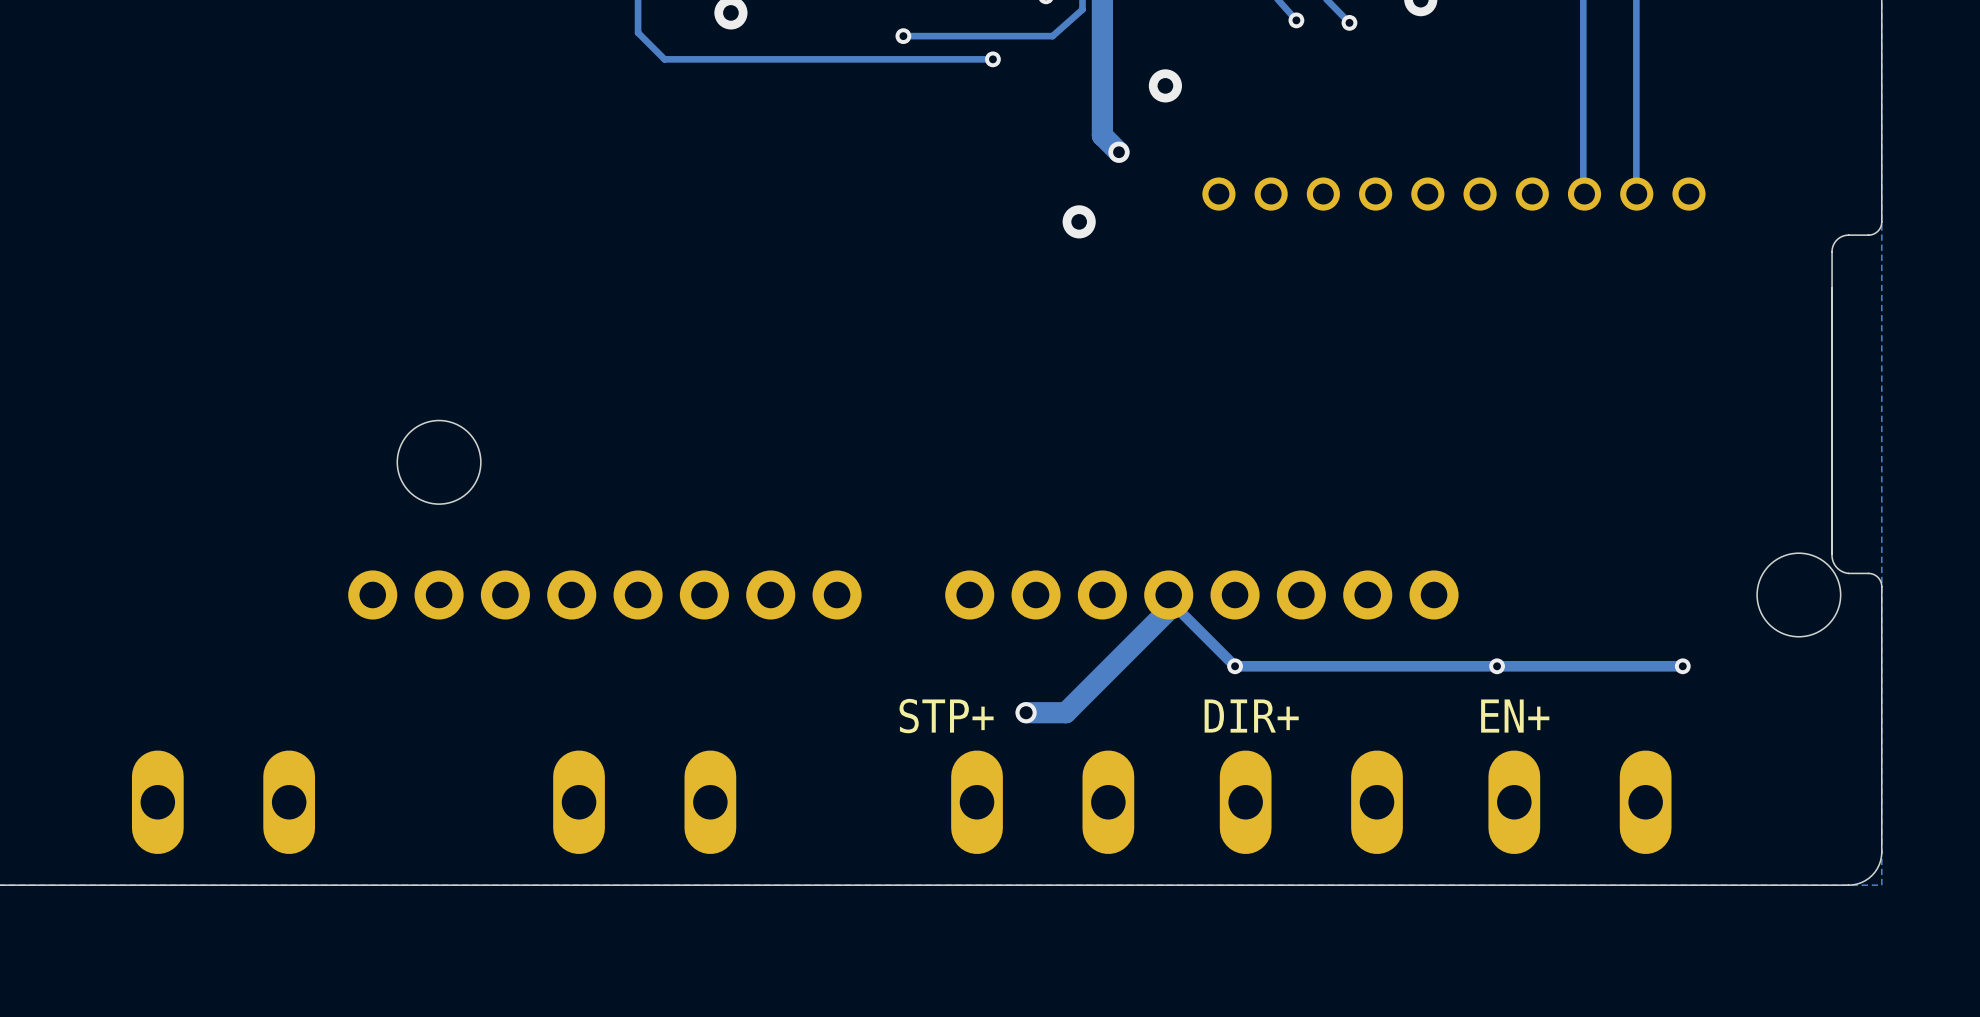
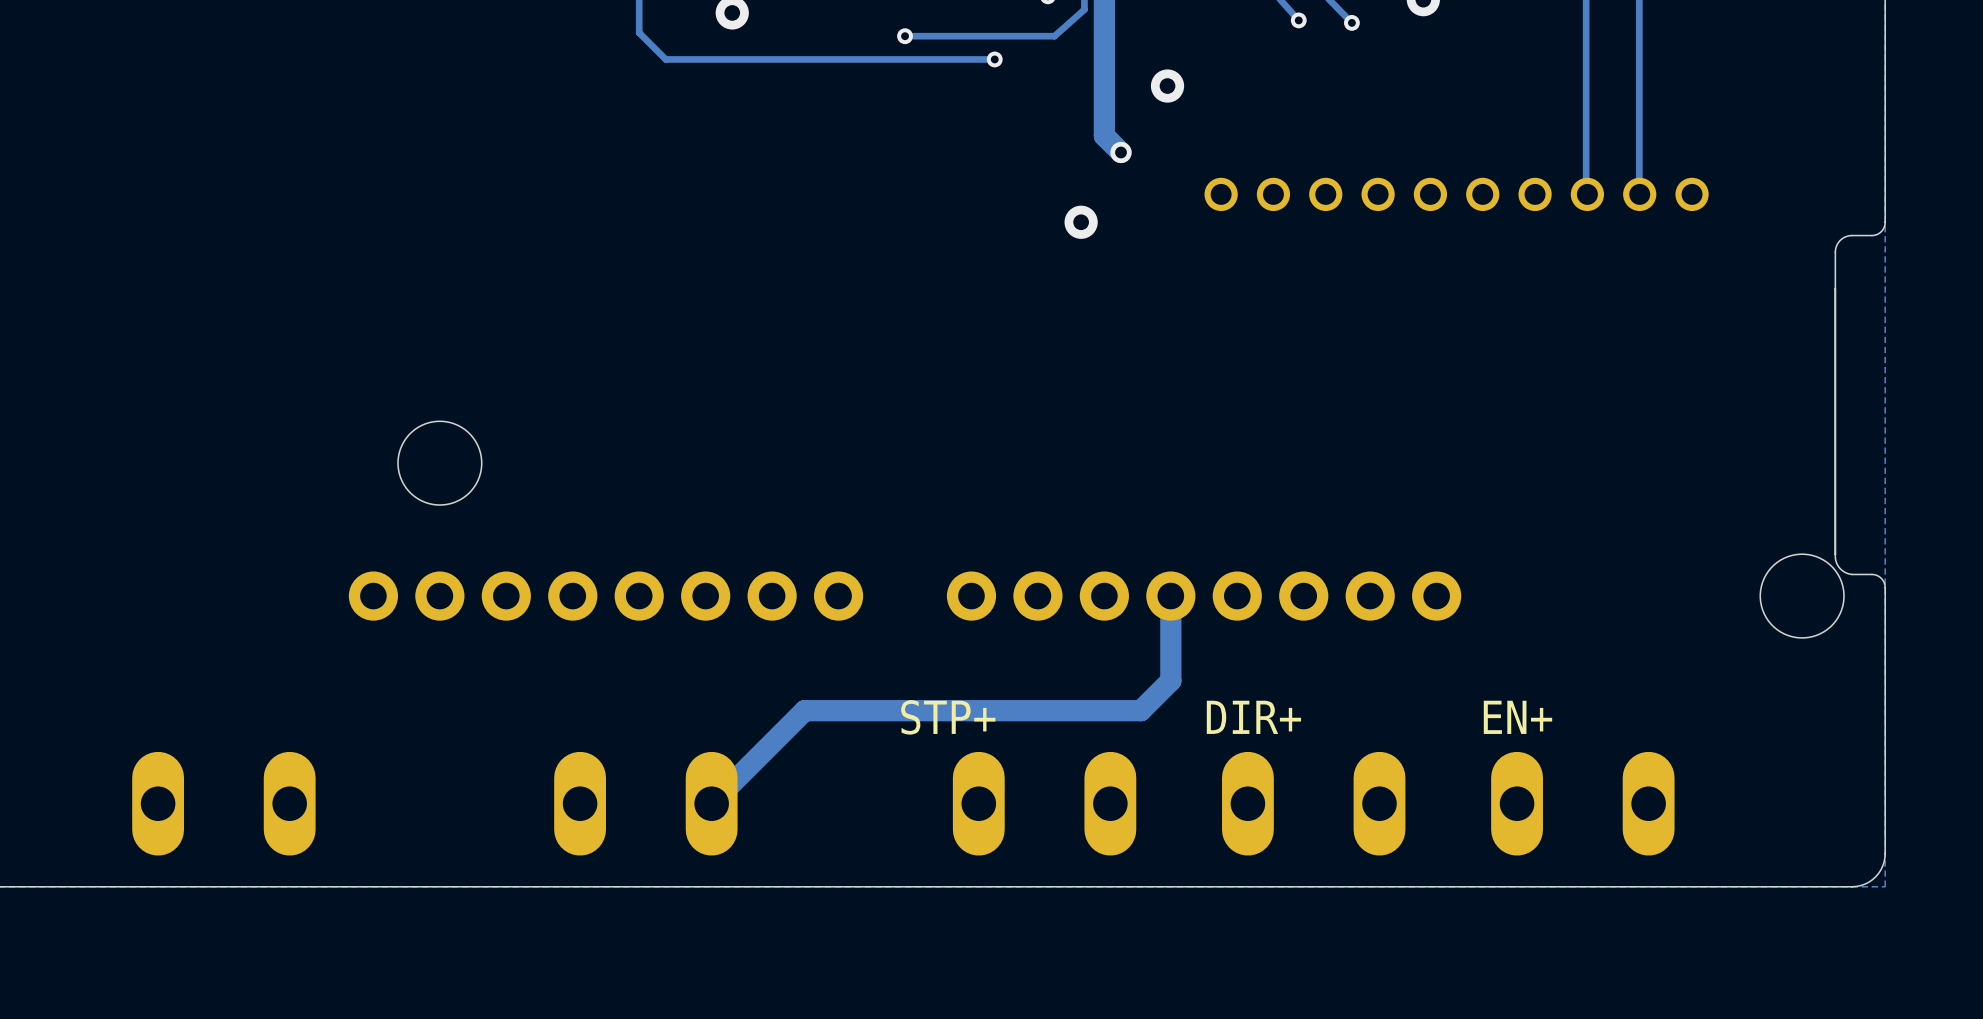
track: (1168, 599) (1235, 666) (1682, 666) -> none
track: (1168, 609) (1065, 712) (1026, 712) -> (1170, 611) (1170, 680) (1140, 710) (804, 710) (711, 803)
via: (1235, 666) -> none
via: (1497, 666) -> none
via: (1682, 666) -> none
via: (1026, 712) -> none

